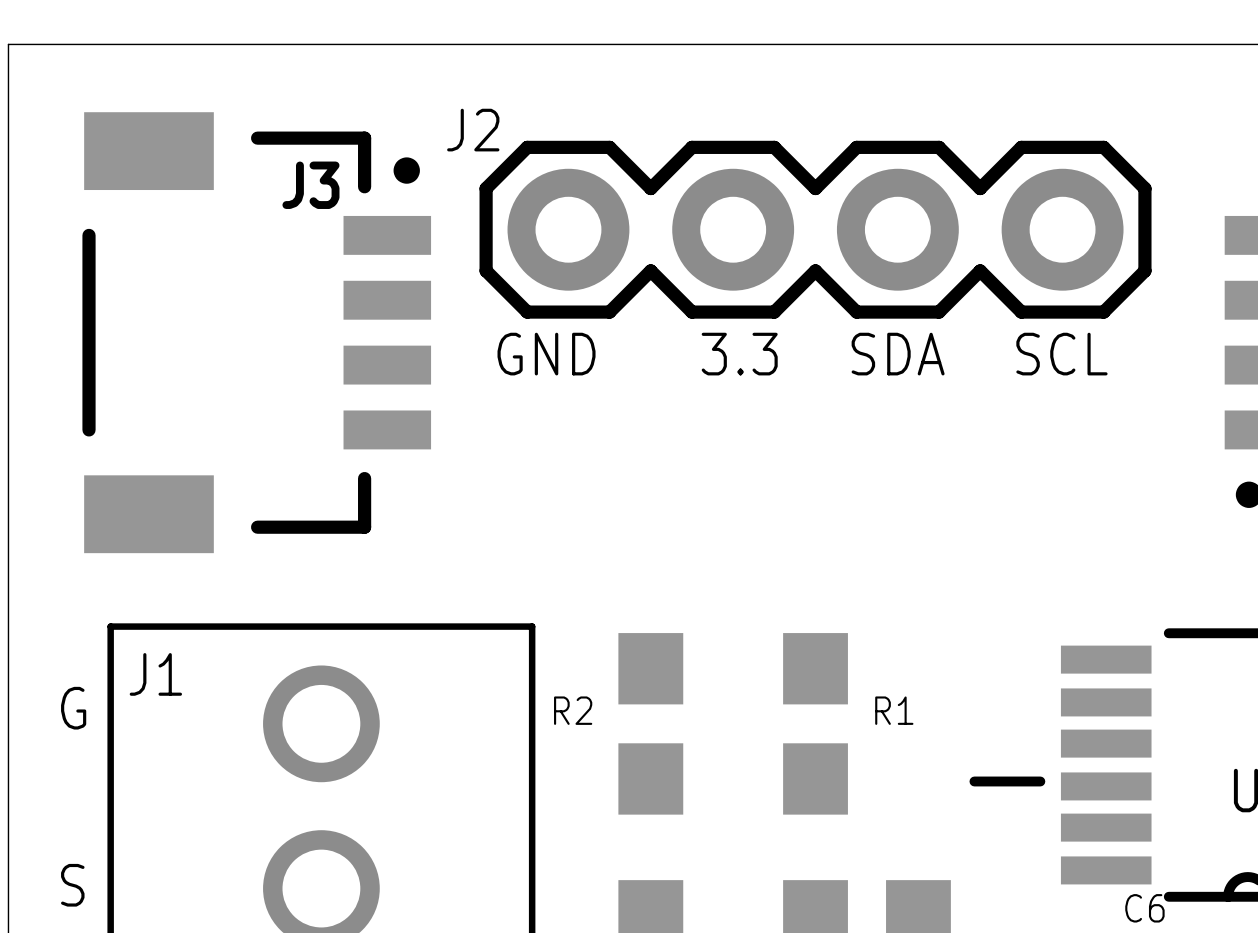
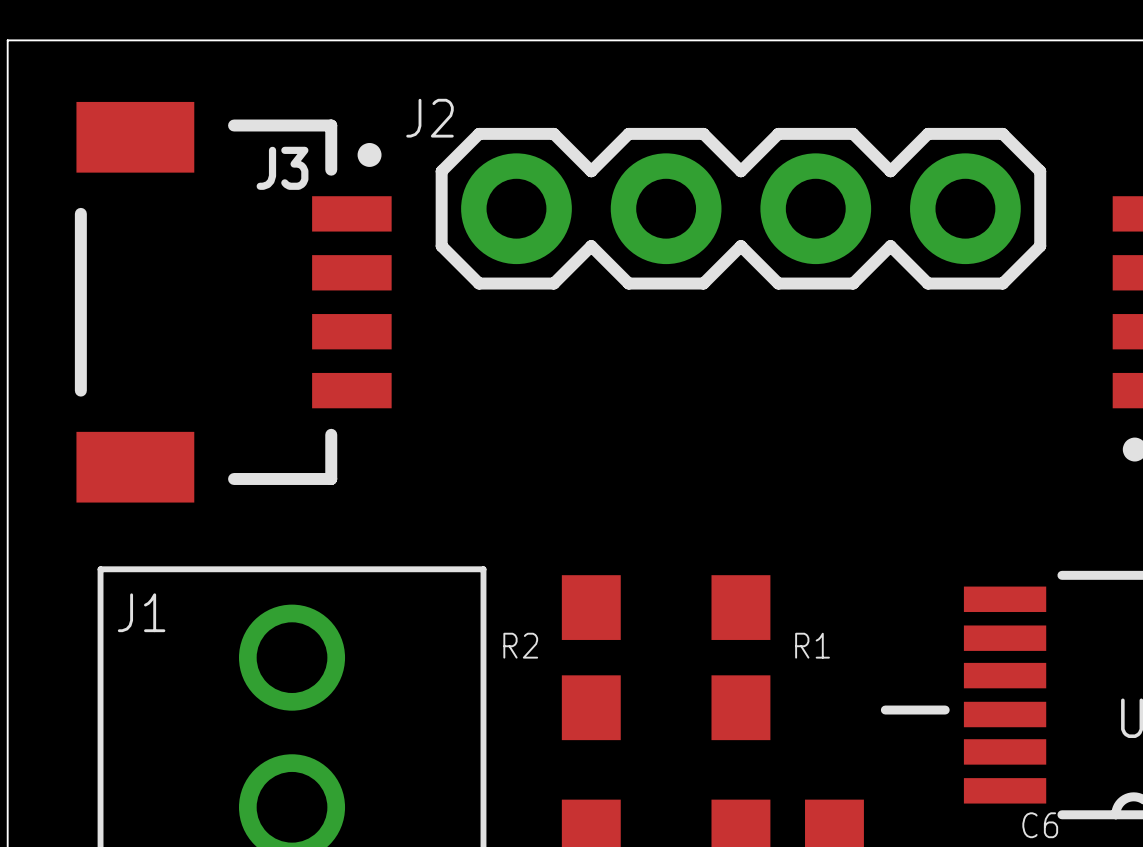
text: GND (546, 354) -> none
text: 3.3 (739, 354) -> none
text: SDA (898, 354) -> none
text: SCL (1061, 354) -> none
text: G (73, 708) -> none
text: S (72, 885) -> none

